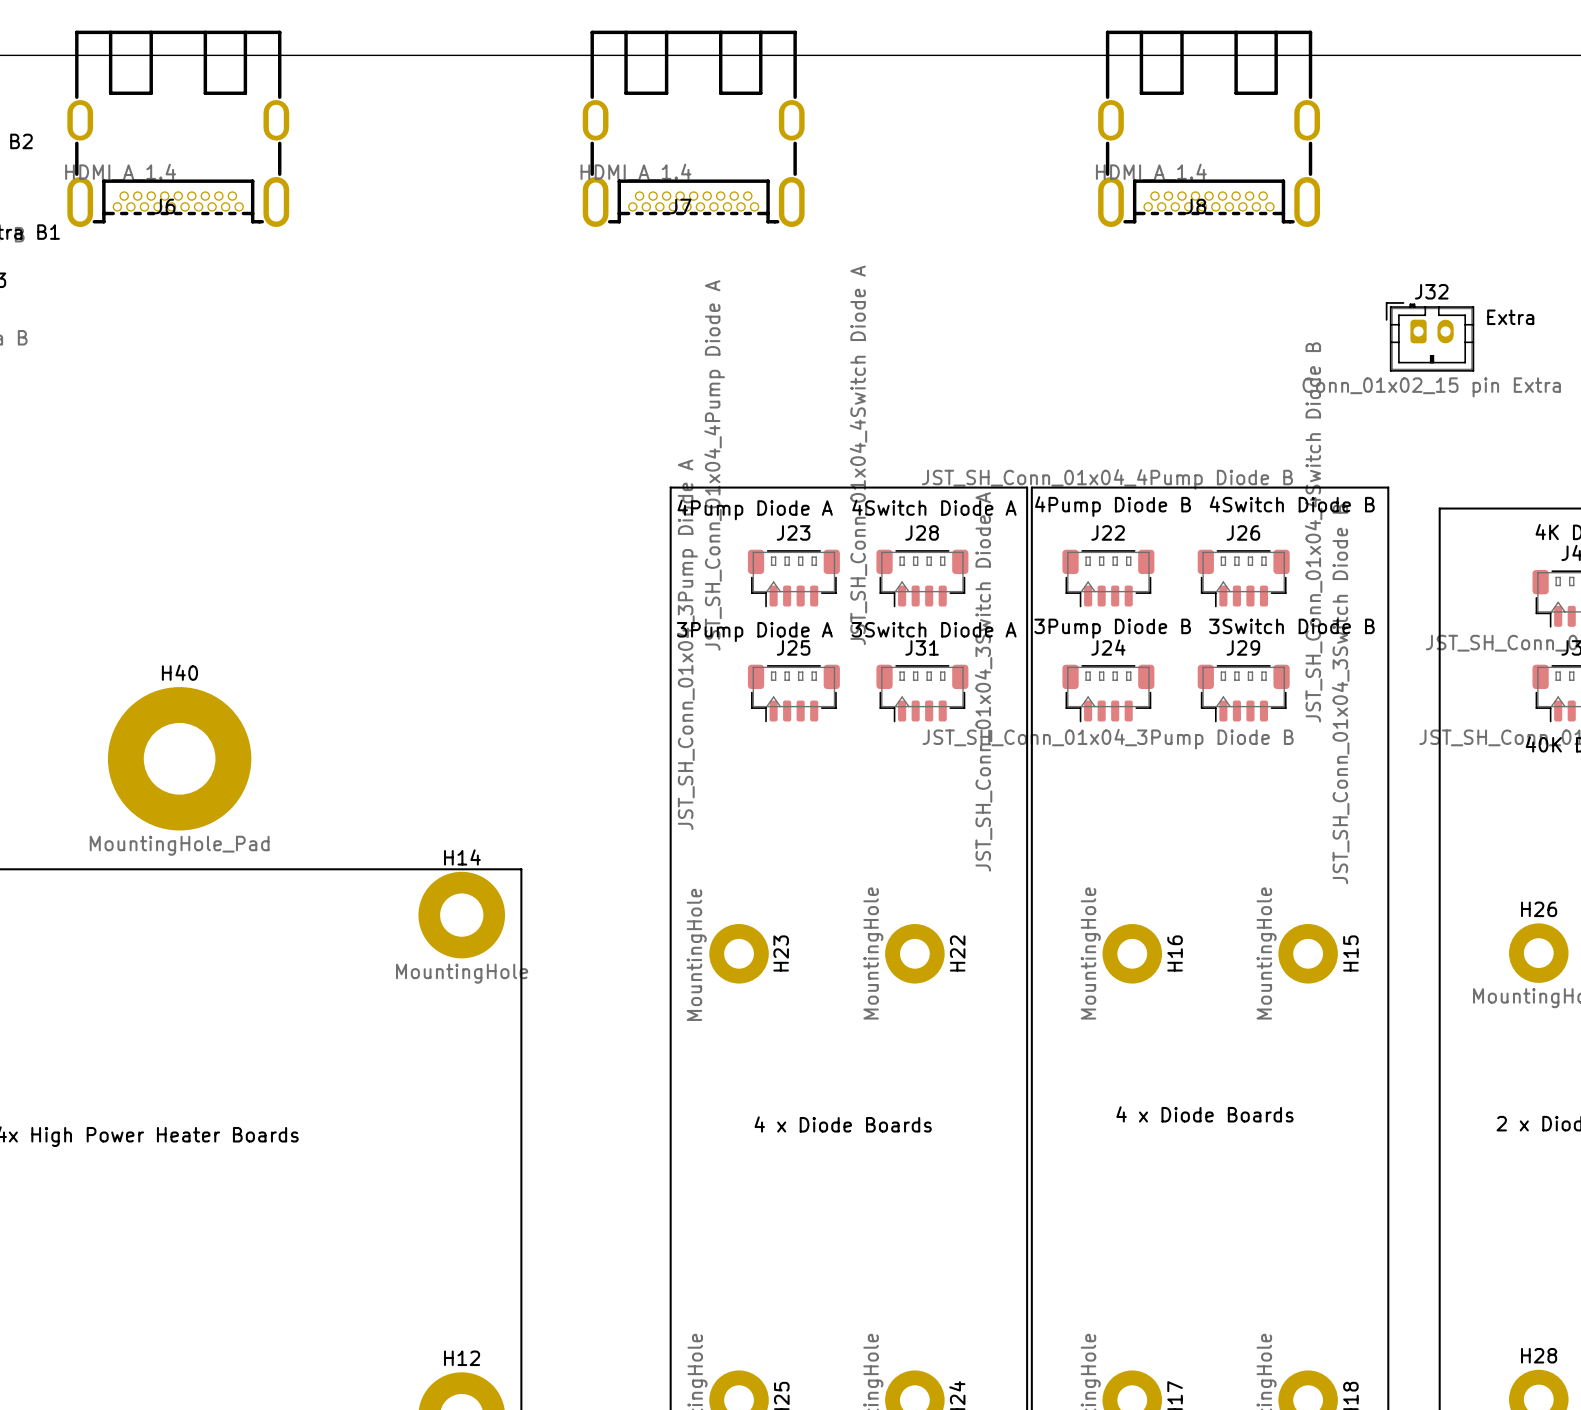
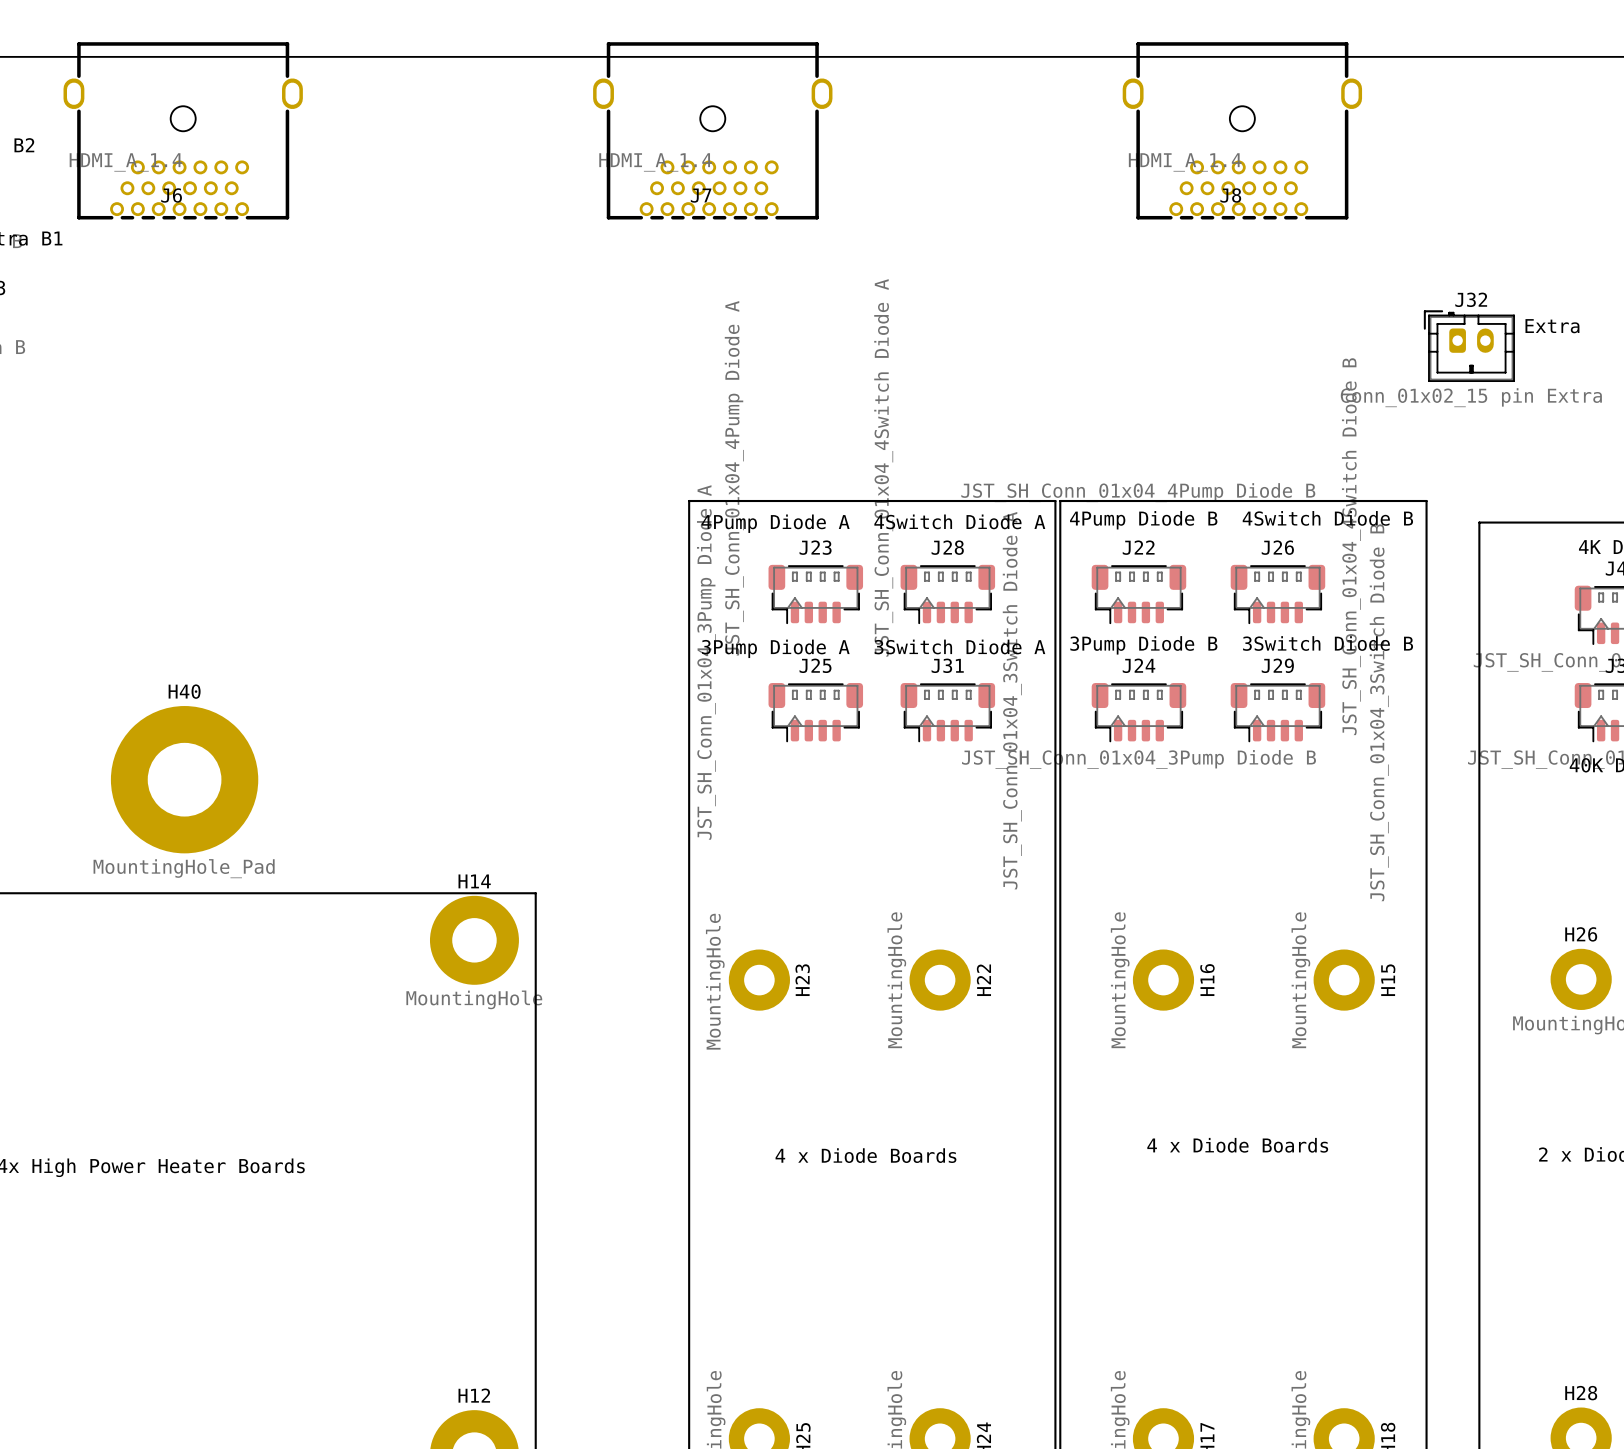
J6 footprint: [67, 30, 290, 228] -> [63, 42, 303, 220]
J7 footprint: [582, 30, 805, 228] -> [593, 42, 833, 220]
J8 footprint: [1098, 30, 1320, 228] -> [1122, 42, 1363, 220]

